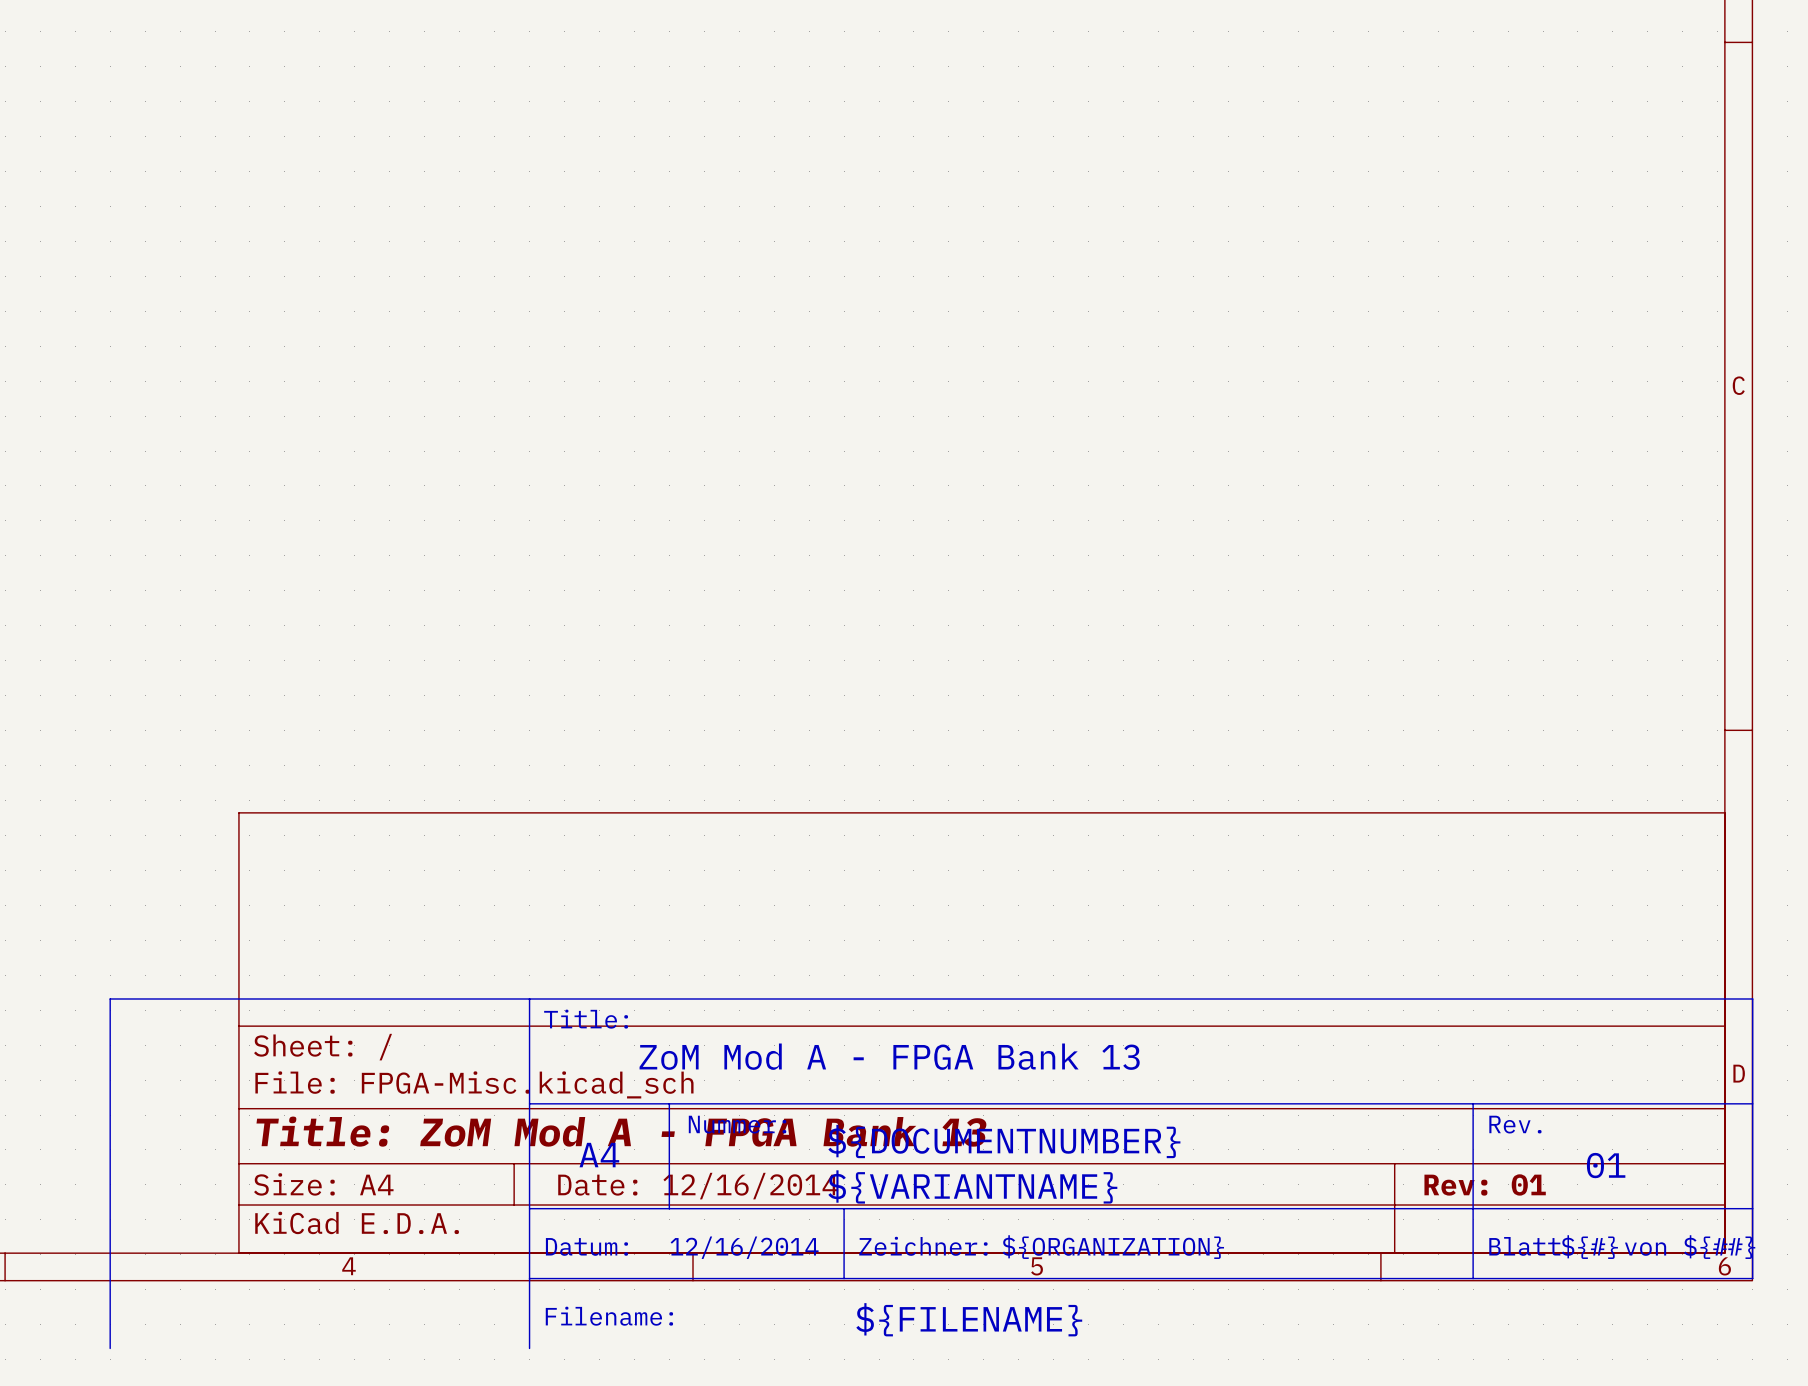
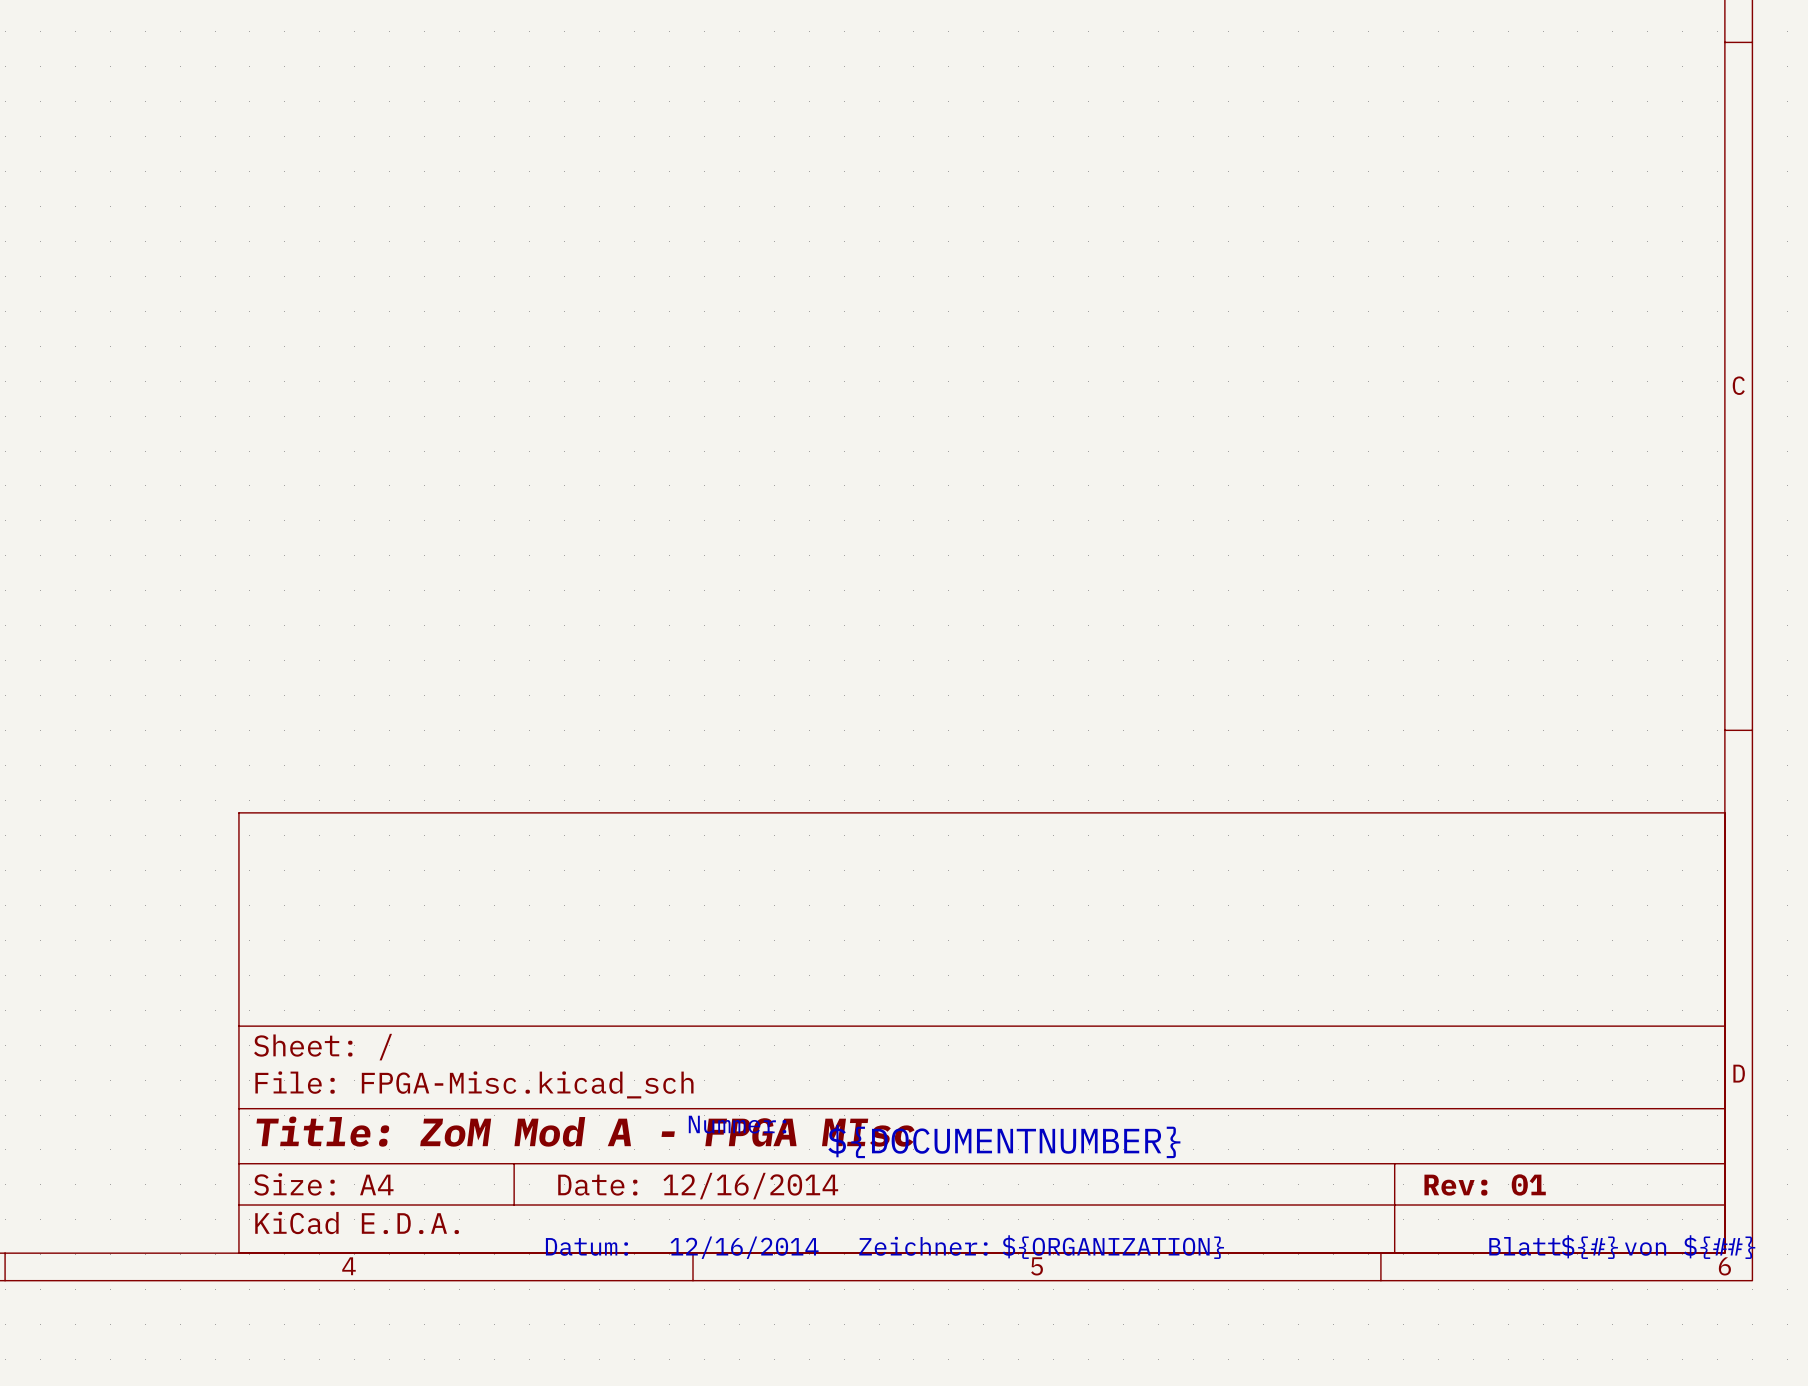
line: (529, 998) (529, 1348) -> none
text: Title: (586, 1019) -> none
text: ZoM Mod A - FPGA Bank 13 (889, 1056) -> none
line: (529, 1103) (1752, 1103) -> none
line: (669, 1103) (669, 1208) -> none
line: (1473, 1103) (1473, 1278) -> none
text: Rev. (1515, 1124) -> none
title block: Title: ZoM Mod A - FPGA Bank 13 (621, 1131) -> Title: ZoM Mod A - FPGA MIsc (585, 1131)
text: A4 (599, 1155) -> none
text: 01 (1606, 1165) -> none
text: ${VARIANTNAME} (972, 1186) -> none
line: (529, 1208) (1752, 1208) -> none
line: (844, 1208) (844, 1278) -> none
line: (529, 1278) (1752, 1278) (1752, 998) (110, 998) (110, 1348) -> none
text: Filename: (609, 1316) -> none
text: ${FILENAME} (969, 1319) -> none

